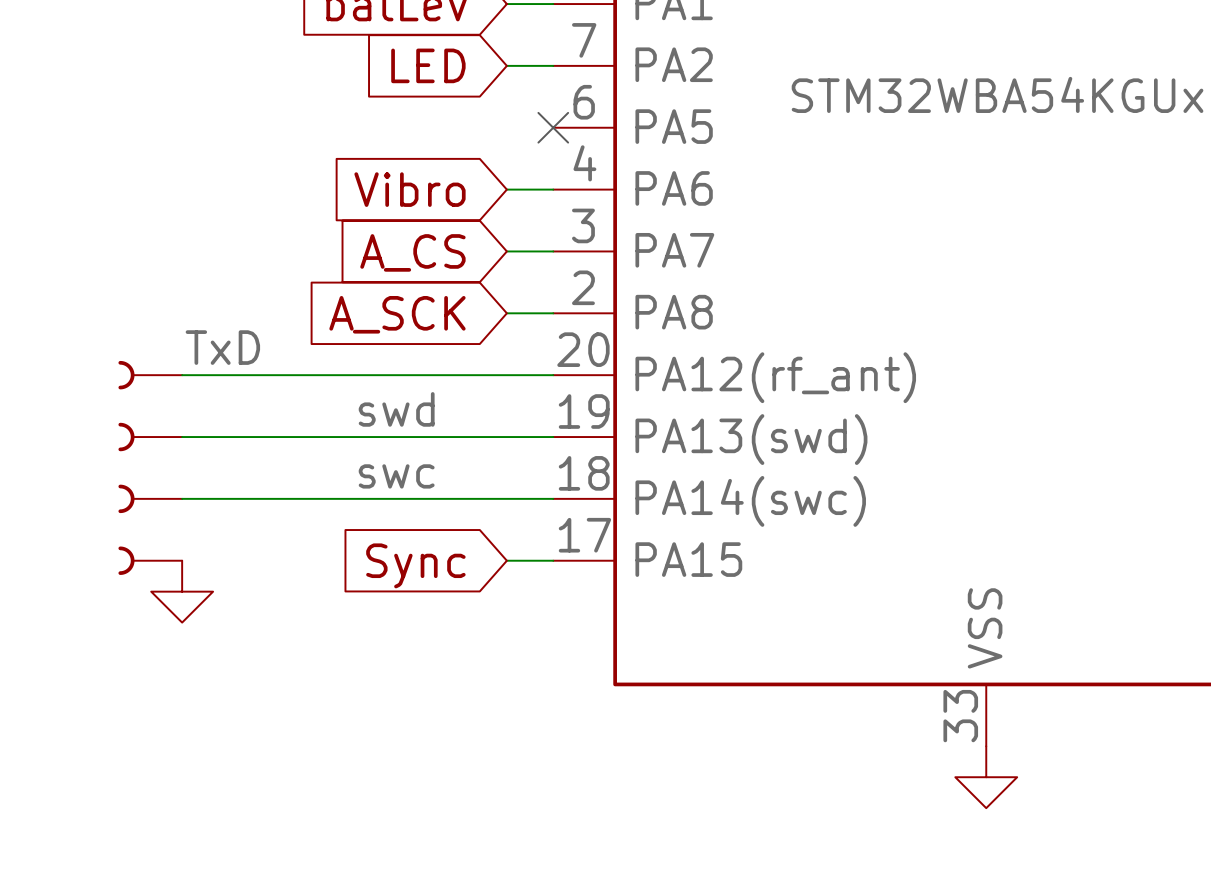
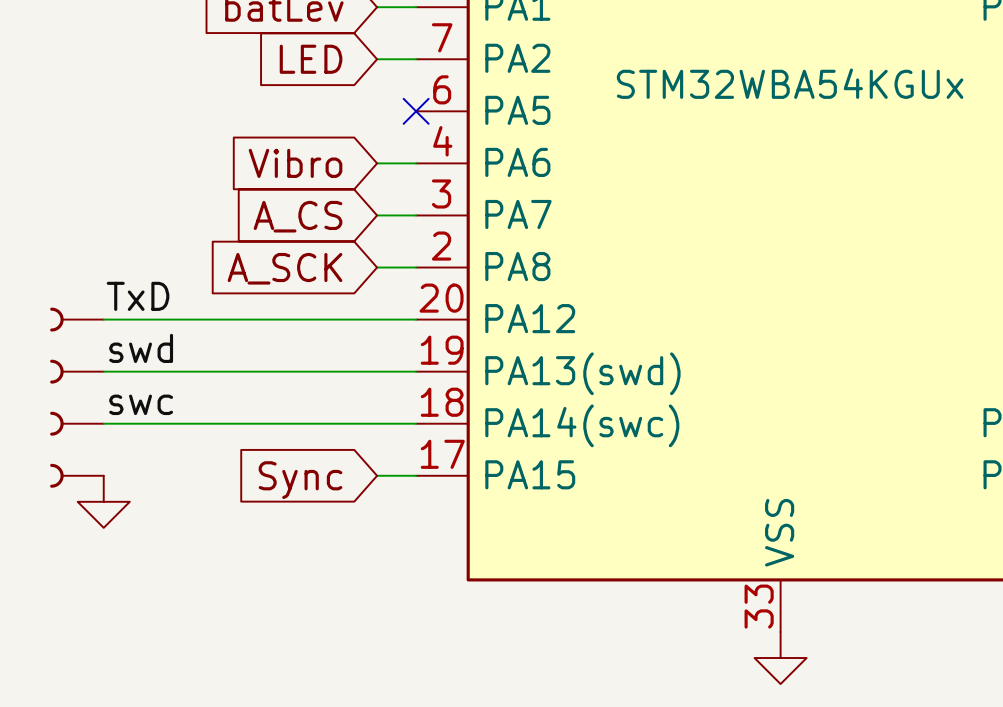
part pin name: PA12(rf_ant) (775, 377) -> PA12 (530, 318)
label position: swd (396, 409) -> swd (141, 348)
label position: swc (396, 476) -> swc (141, 404)

